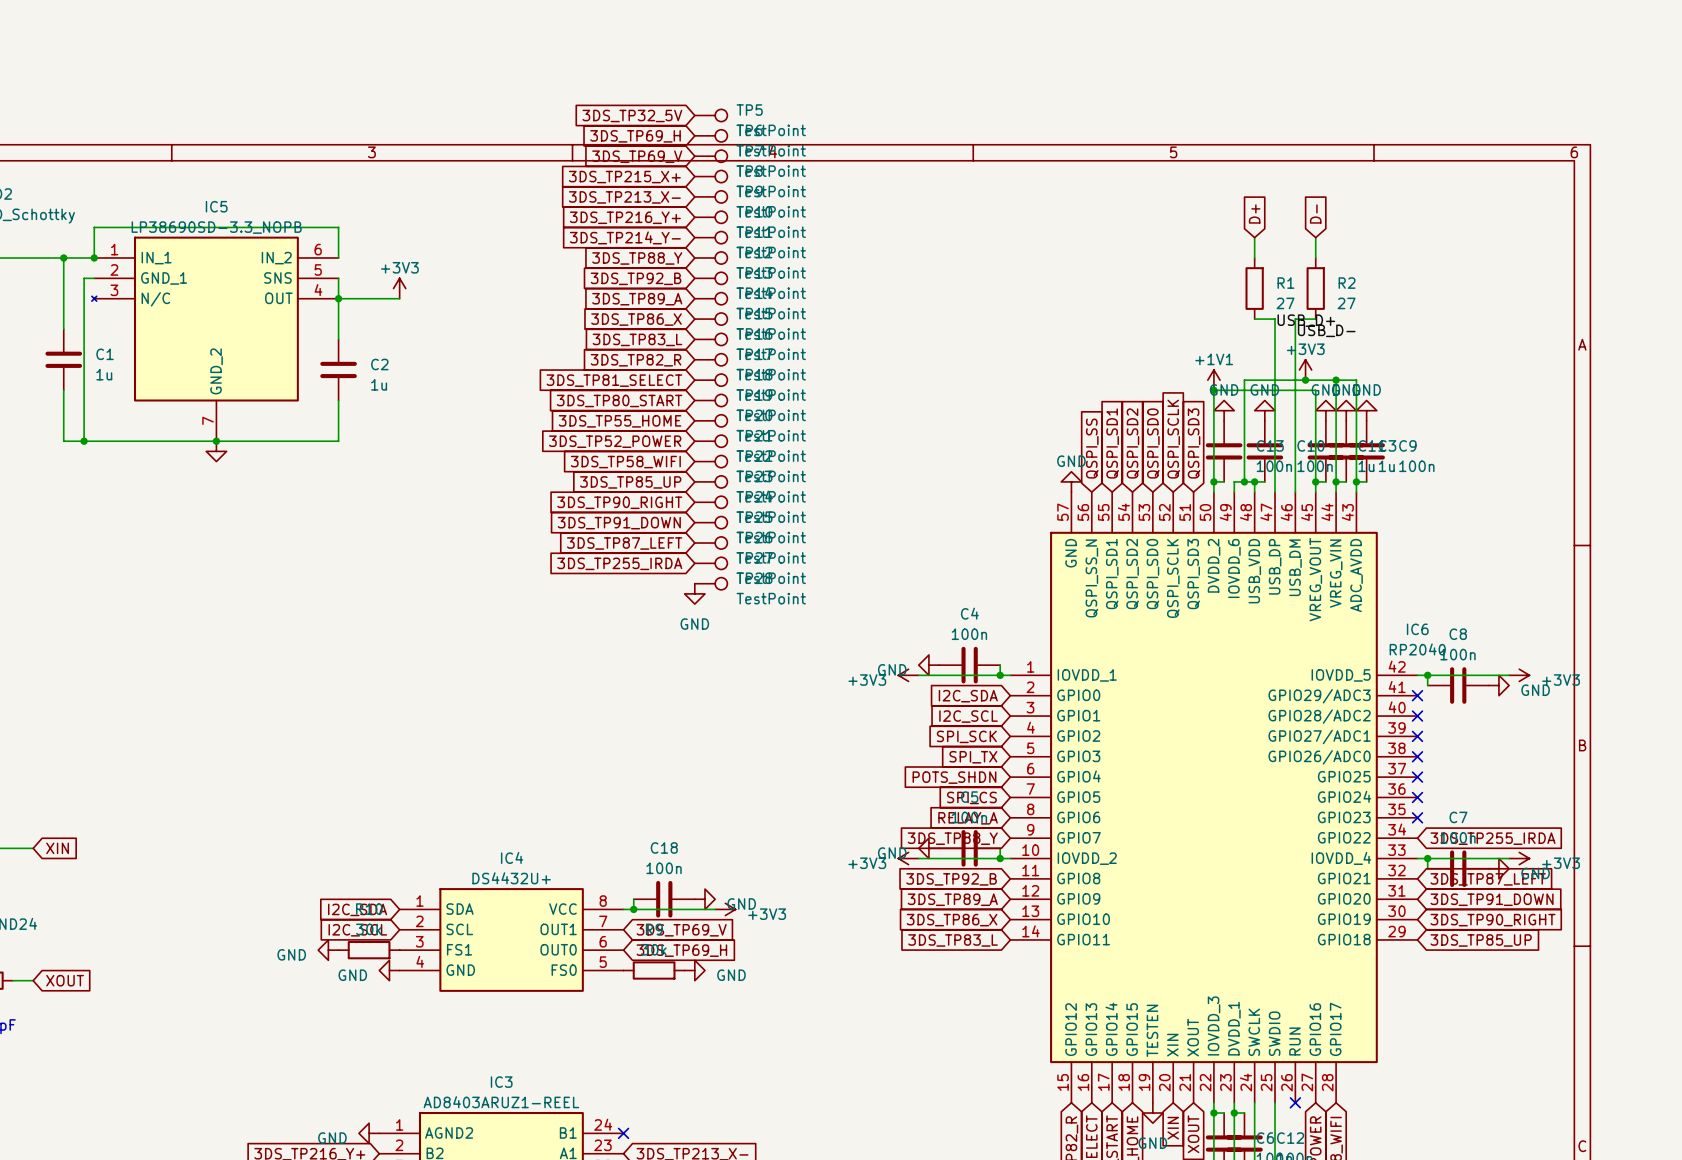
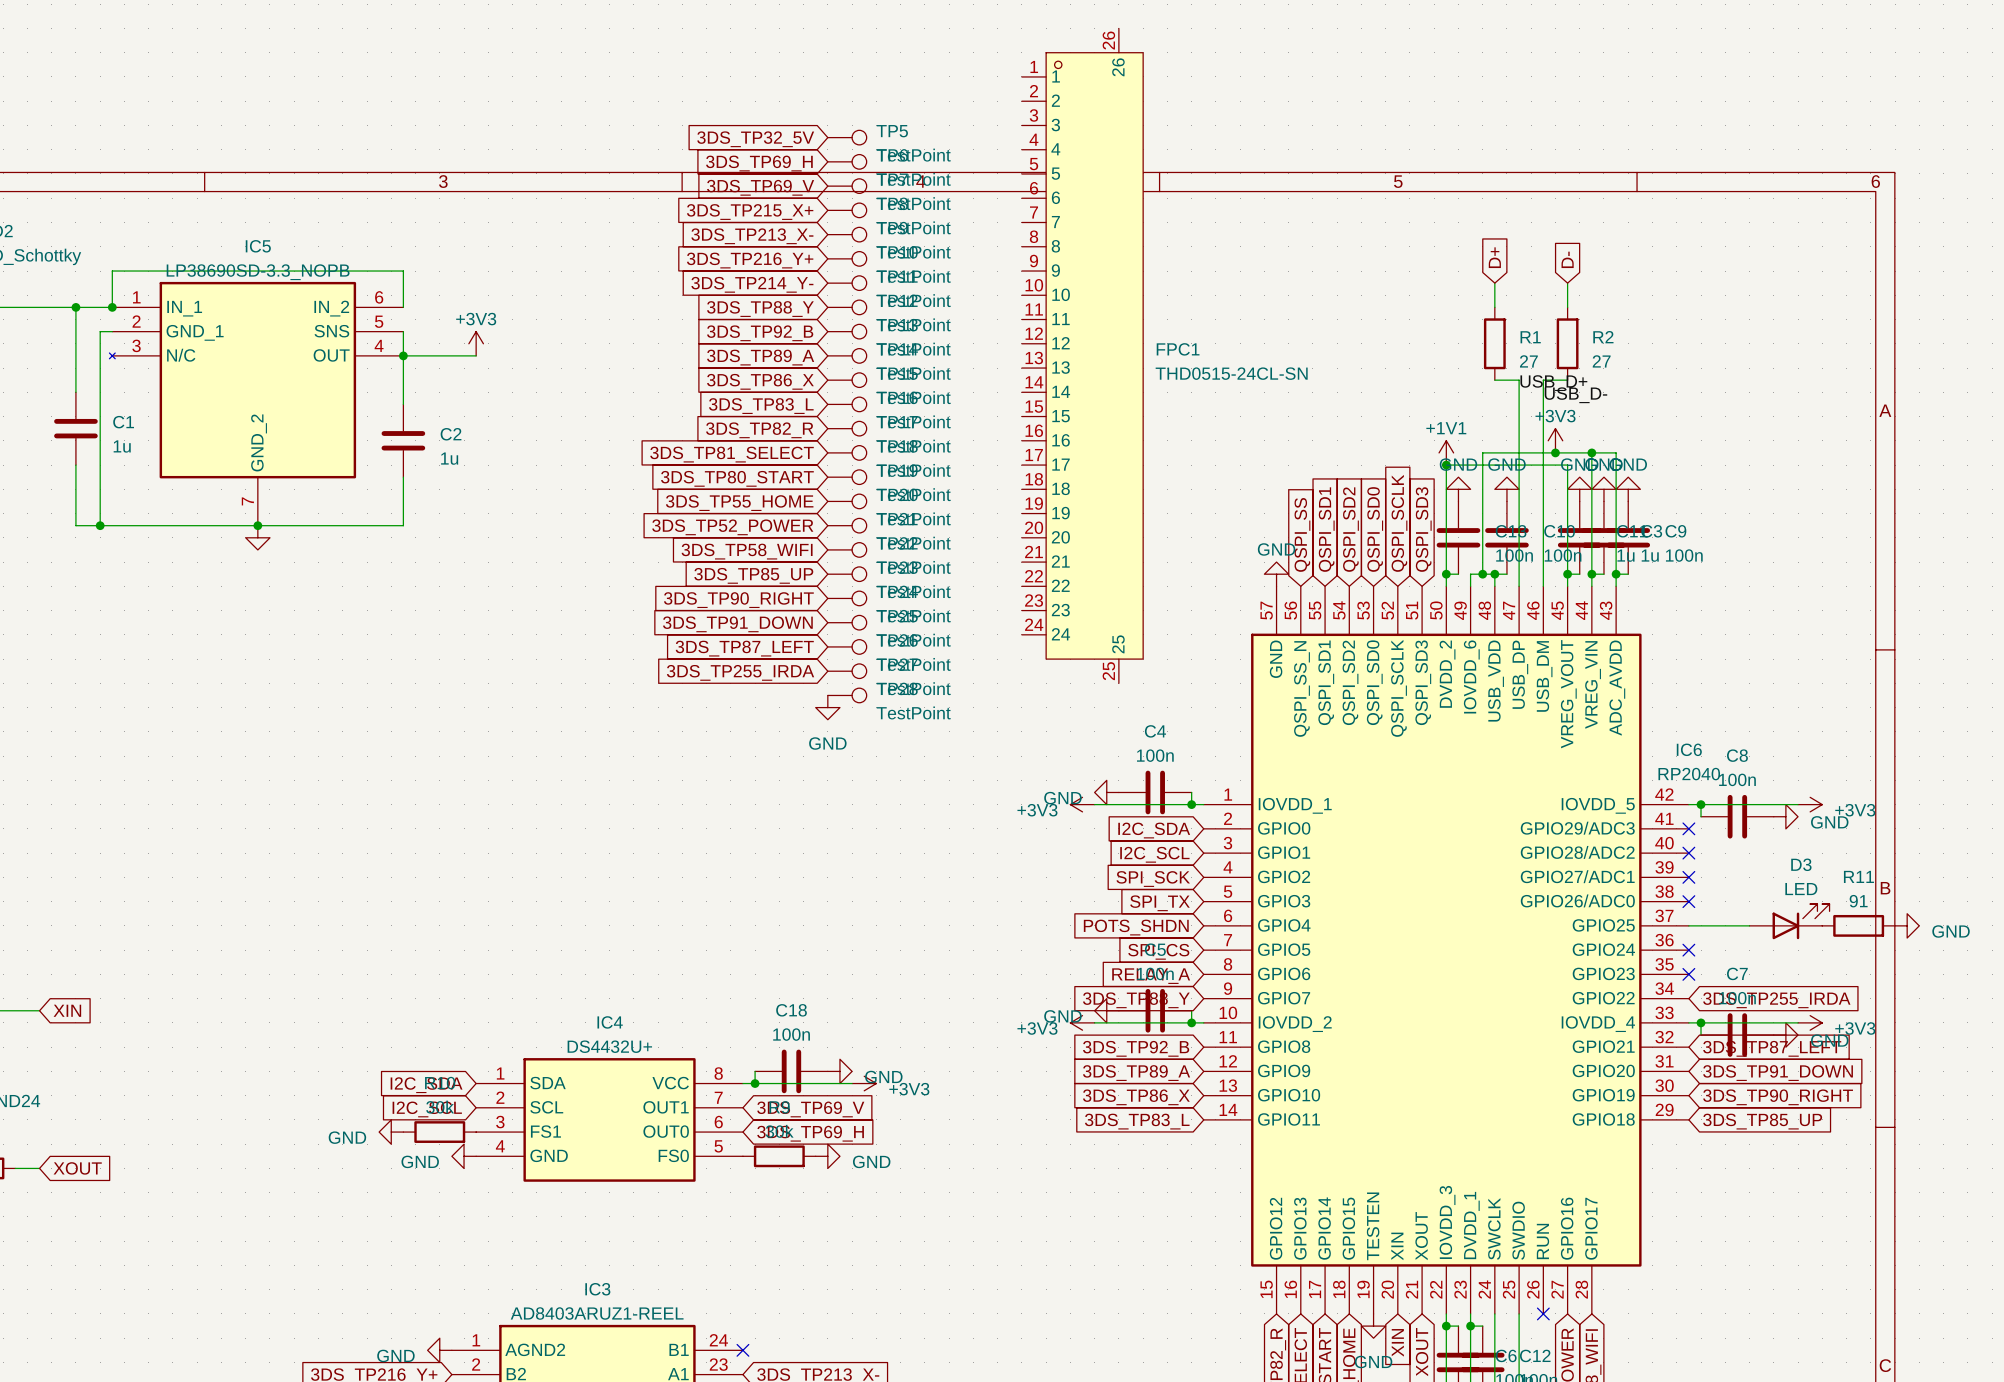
FPC1: none -> THD0515-24CL-SN (1082, 355)
D3: none -> LED (1789, 921)
wire: none -> (1688, 925) (1749, 925)
no-connect mark: (1417, 777) -> none
R11: none -> 91 (1858, 925)
power symbol: none -> GND (1907, 925)

